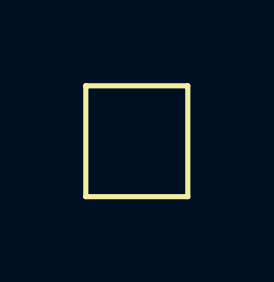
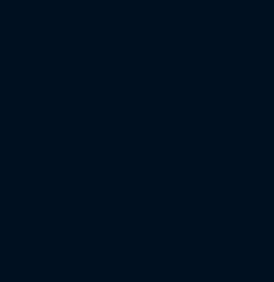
line: (85, 85) (187, 85) (187, 196) (85, 196) (85, 85) -> none

